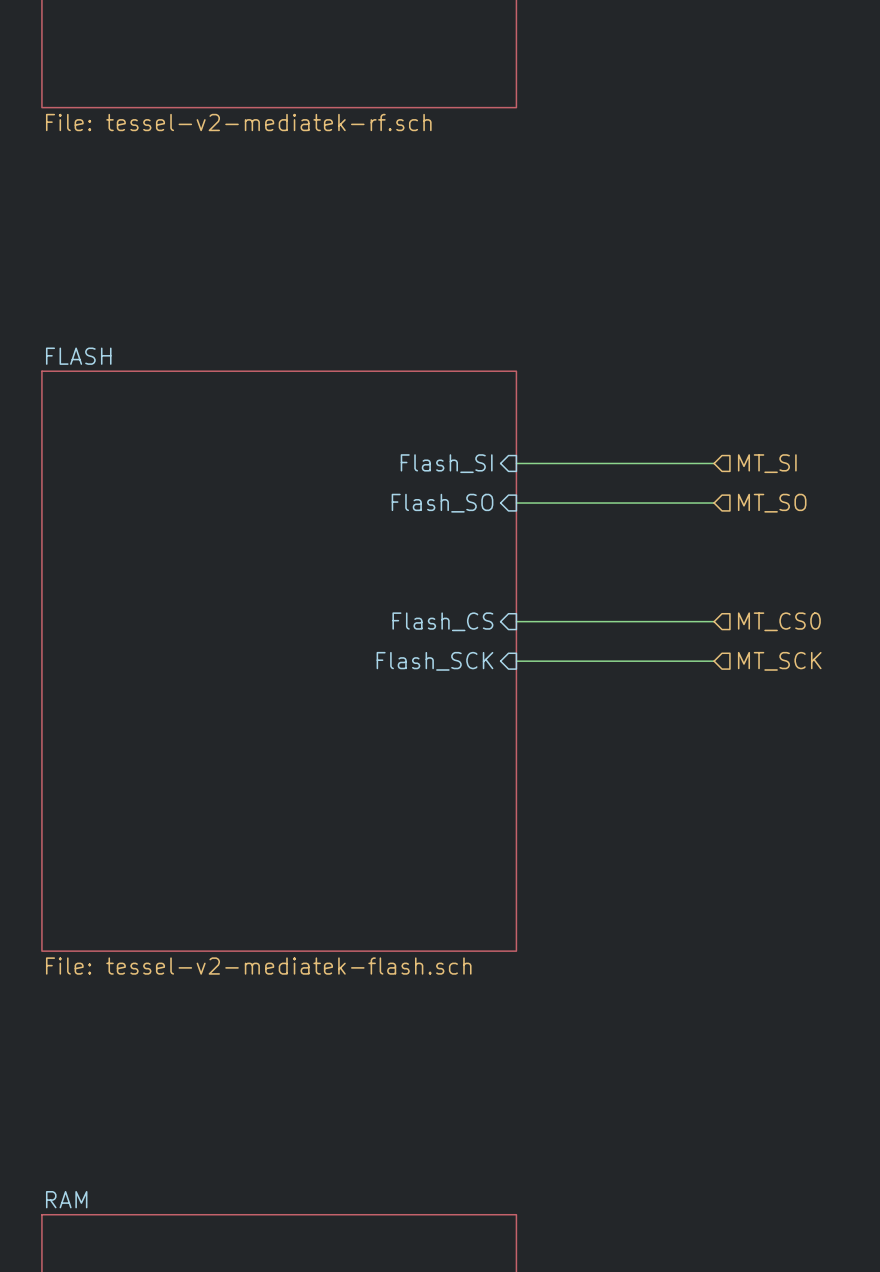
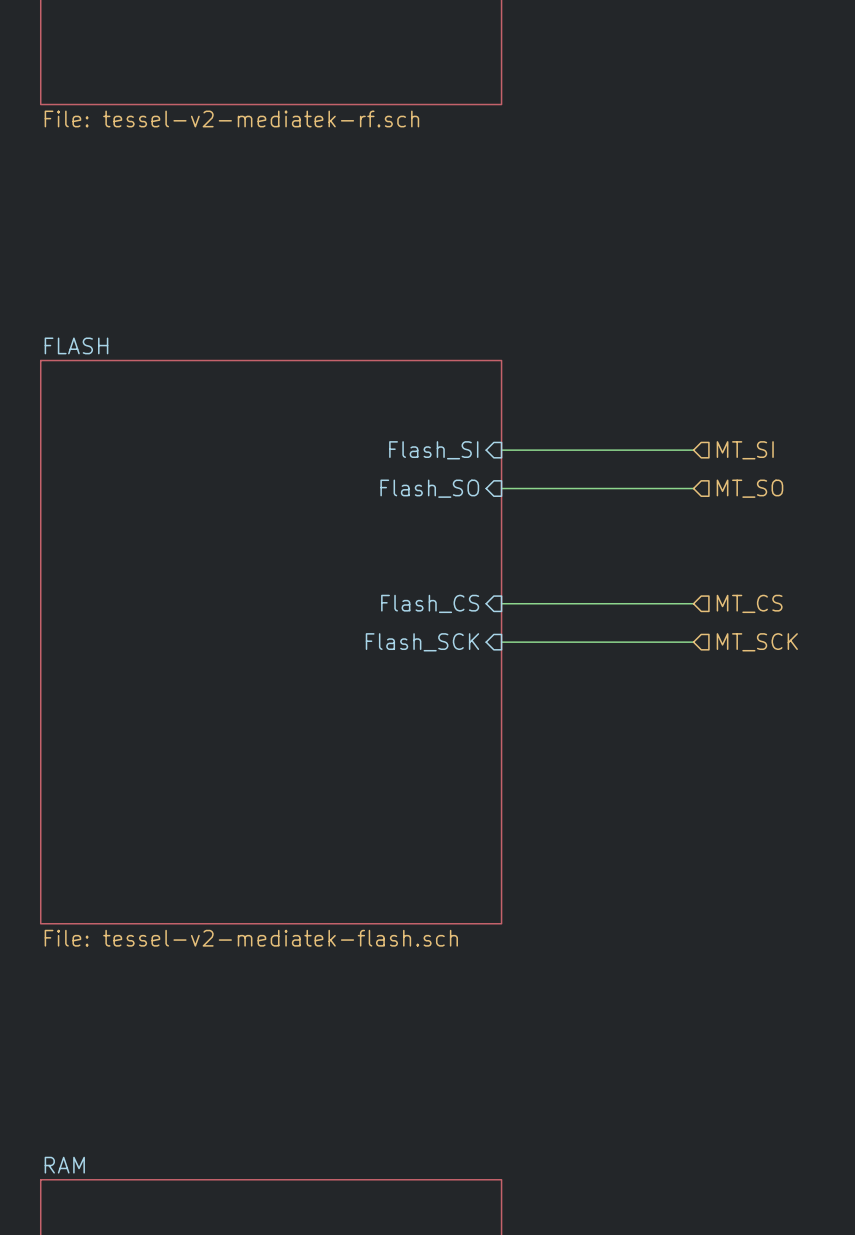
hierarchical label: MT_CS0 (779, 621) -> MT_CS (749, 603)

